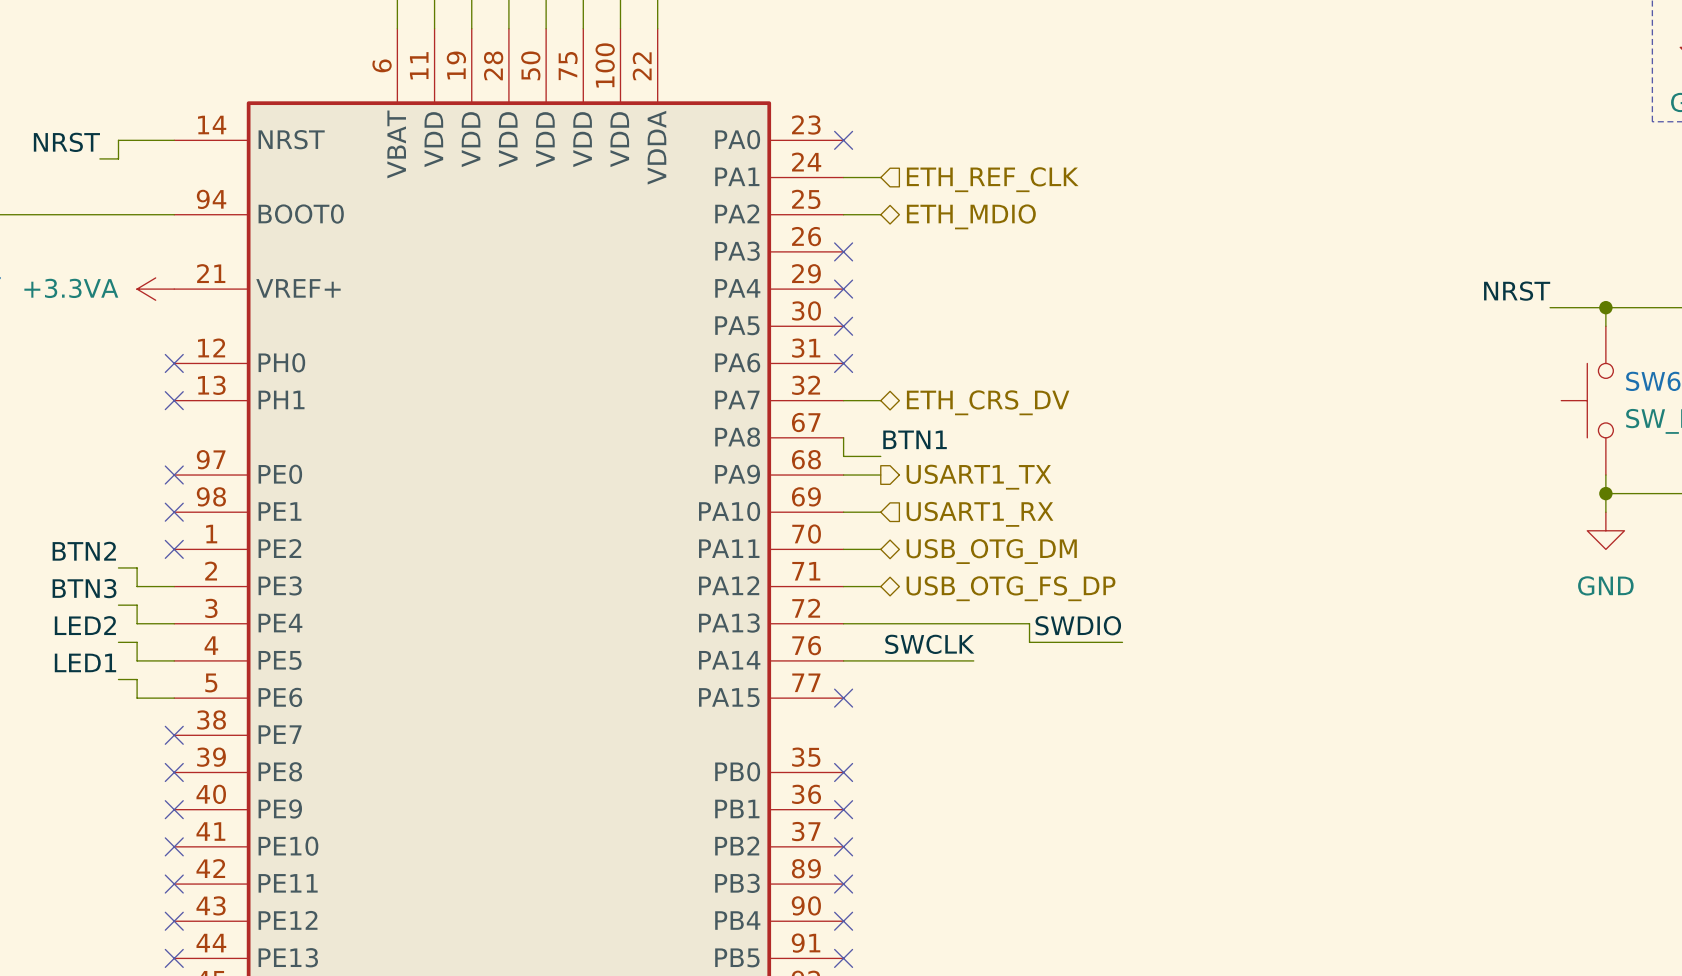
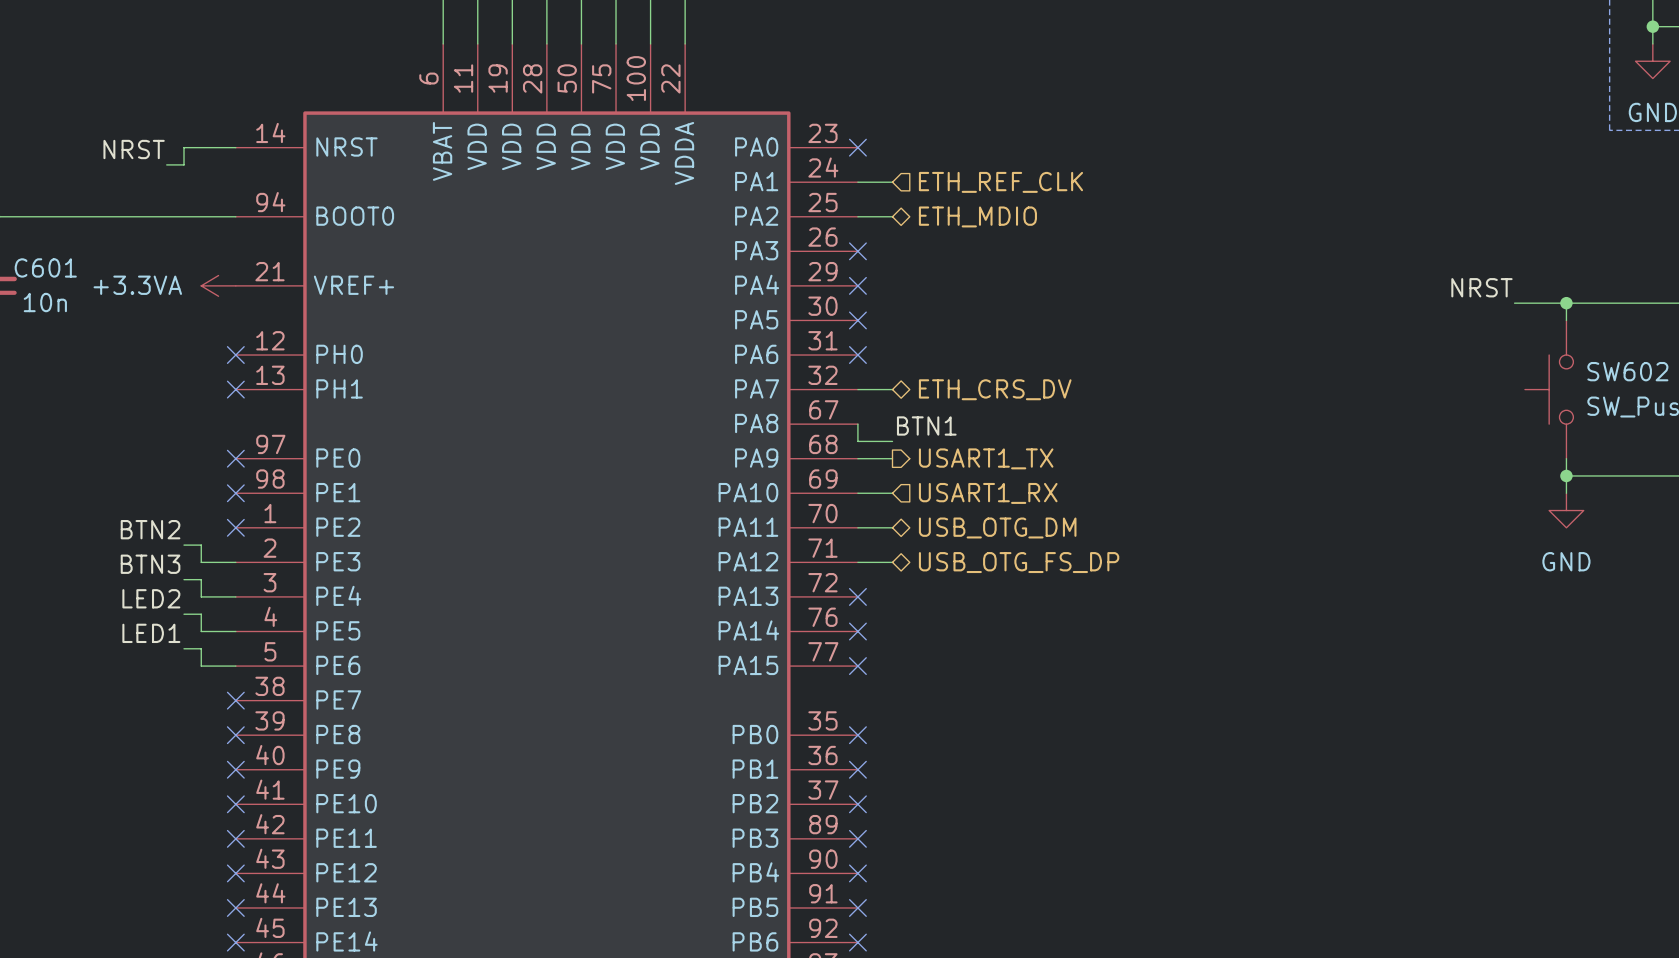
wire: (843, 623) (1029, 623) (1029, 642) (1122, 642) -> none
no-connect mark: none -> (857, 596)
label: SWDIO (1078, 625) -> none
label: SWCLK (929, 644) -> none
wire: (843, 660) (973, 660) -> none
no-connect mark: none -> (857, 631)

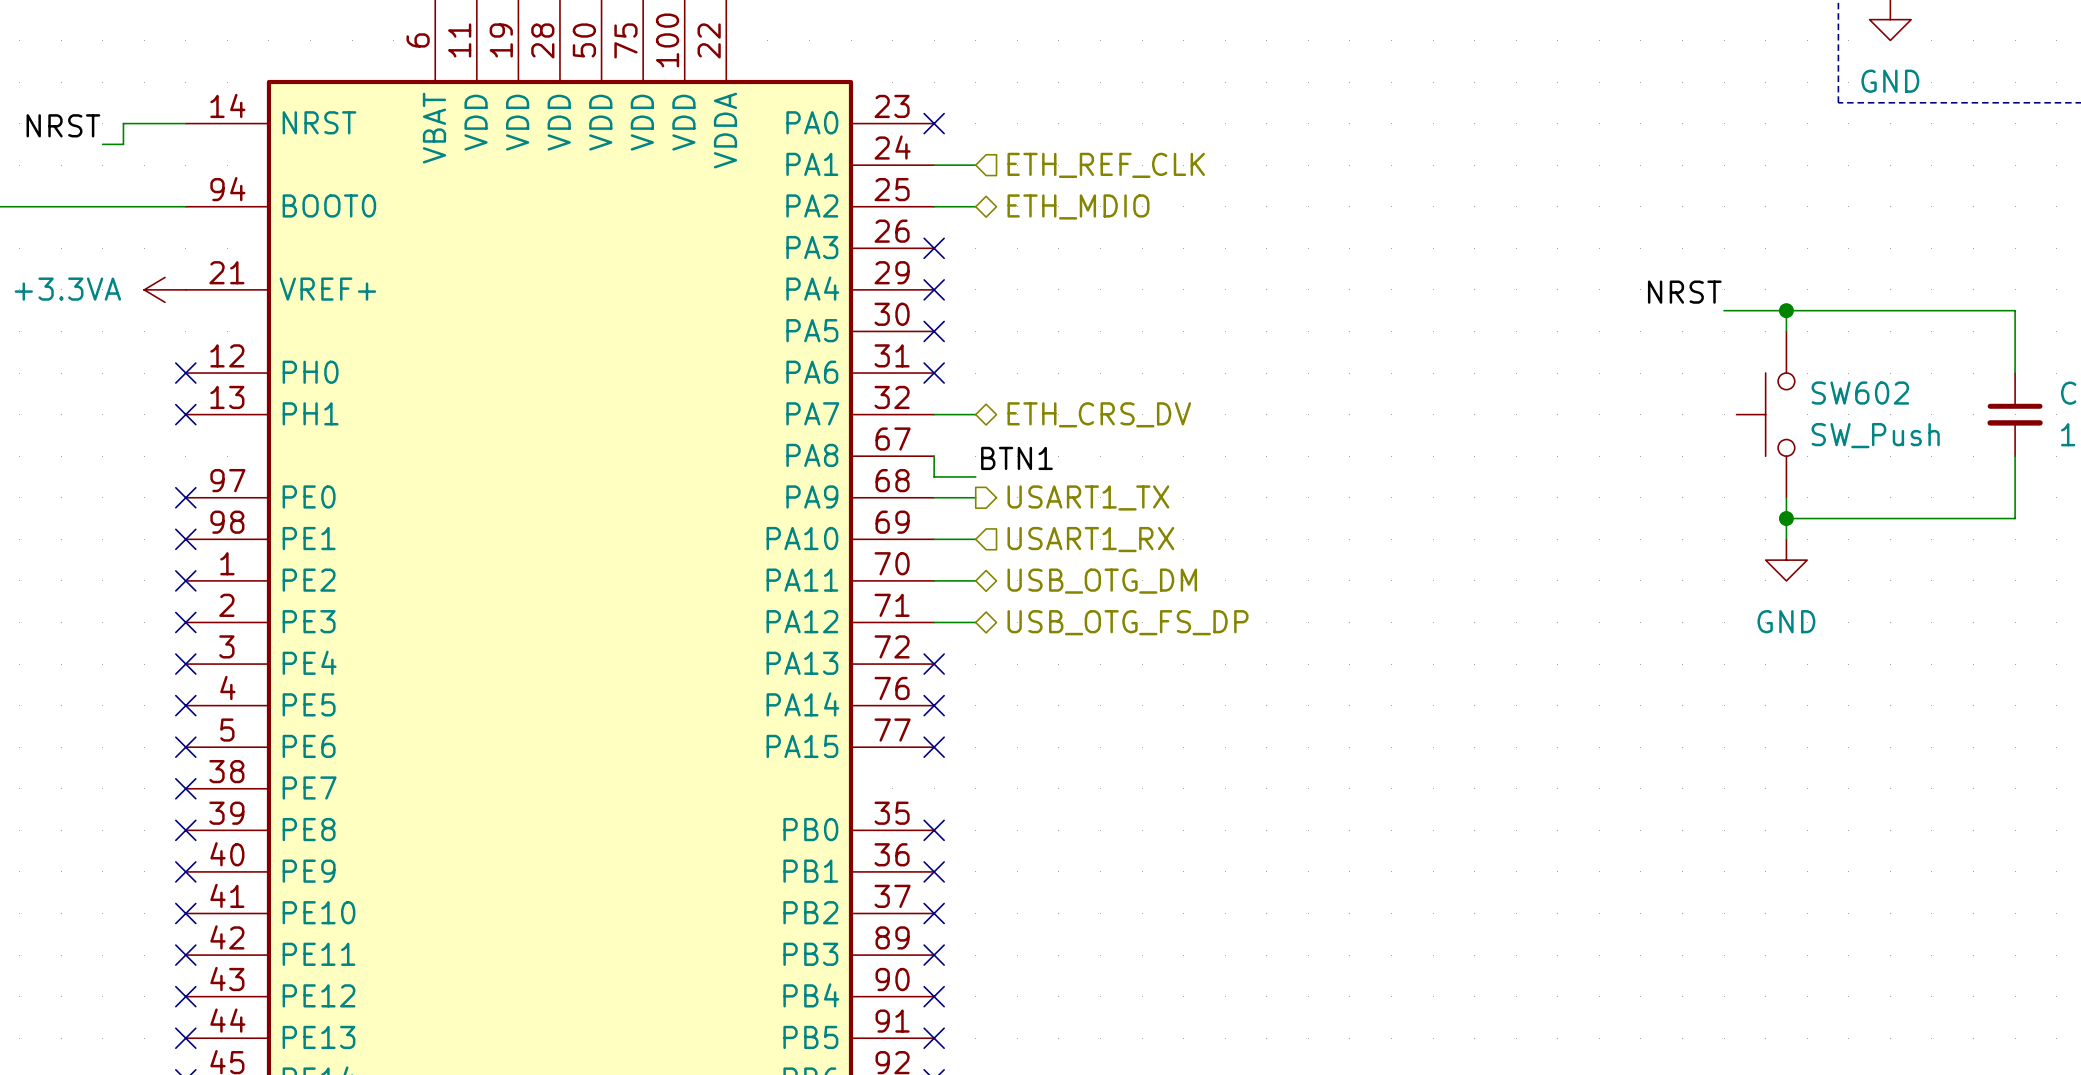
label: BTN2 (150, 529) -> none
wire: (183, 545) (201, 545) (201, 562) (235, 562) -> none
no-connect mark: none -> (185, 622)
label: BTN3 (150, 564) -> none
wire: (183, 579) (201, 579) (201, 596) (235, 596) -> none
no-connect mark: none -> (185, 664)
label: LED2 (151, 598) -> none
wire: (183, 614) (201, 614) (201, 631) (235, 631) -> none
no-connect mark: none -> (185, 705)
label: LED1 (151, 633) -> none
wire: (183, 648) (201, 648) (201, 666) (235, 666) -> none
no-connect mark: none -> (185, 747)

